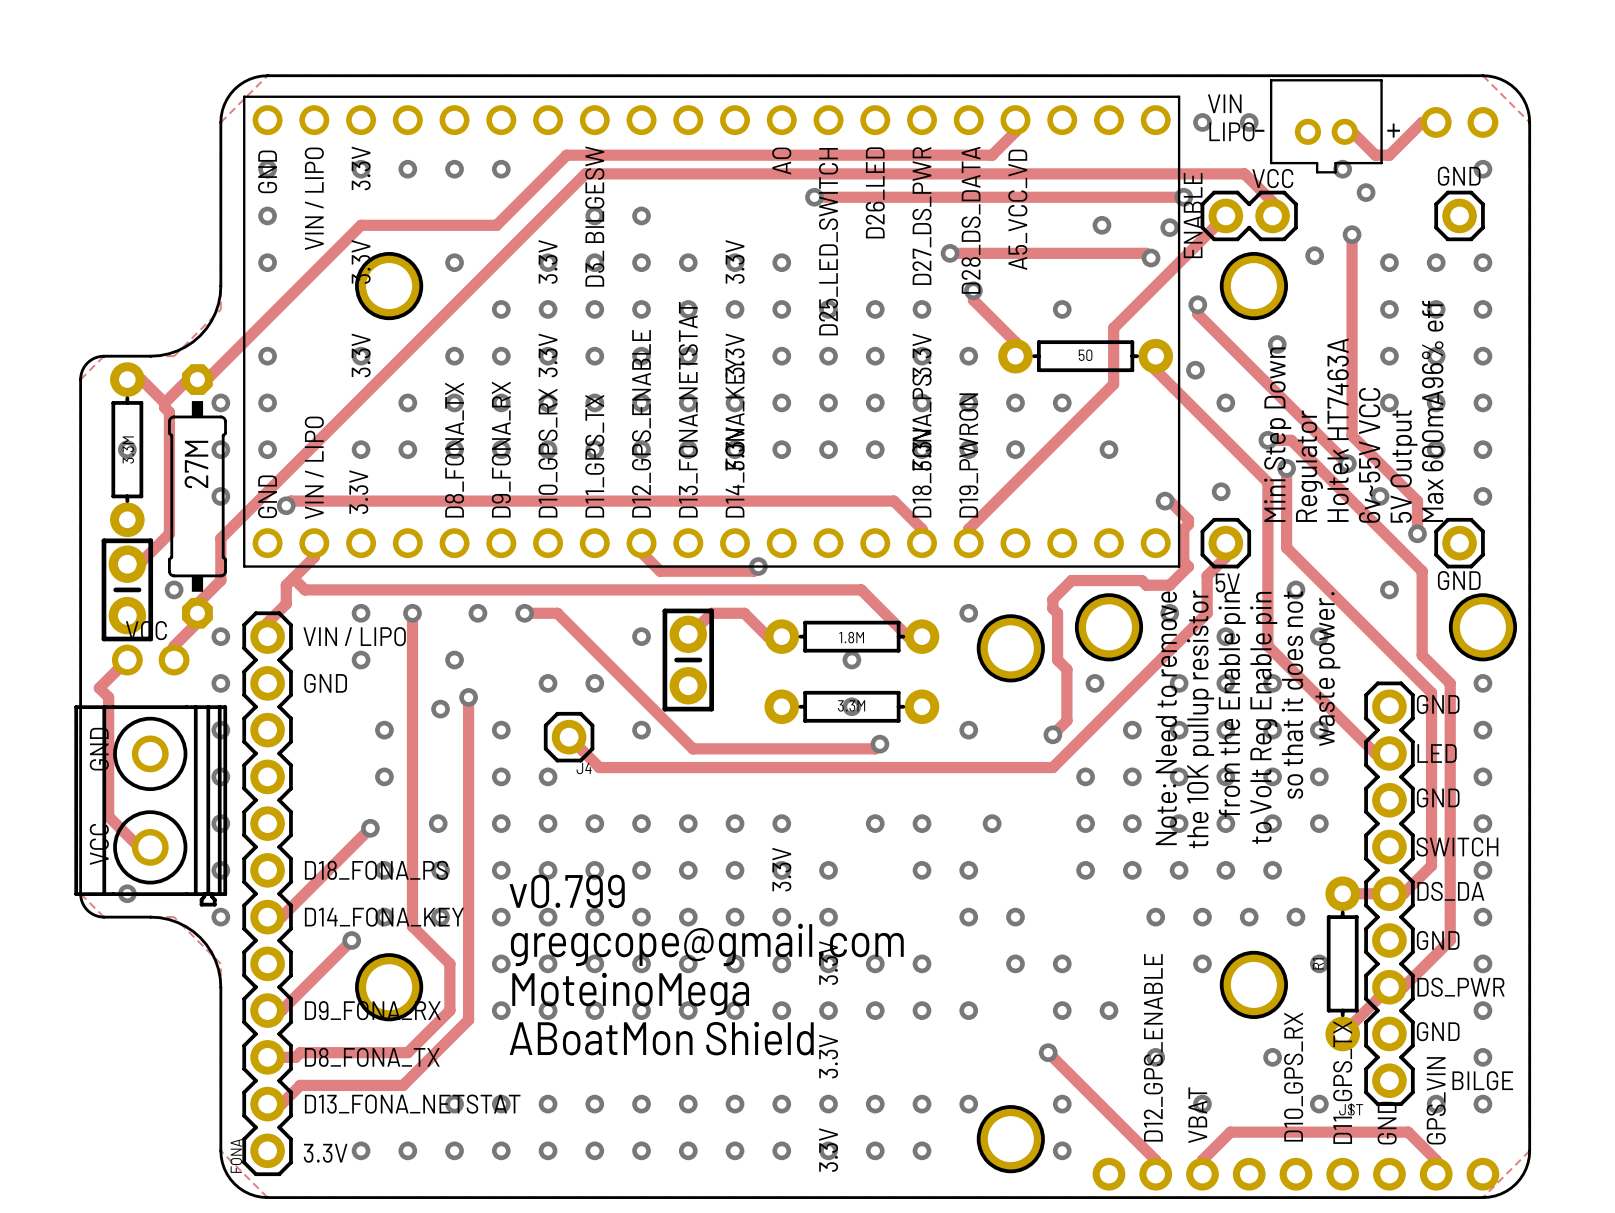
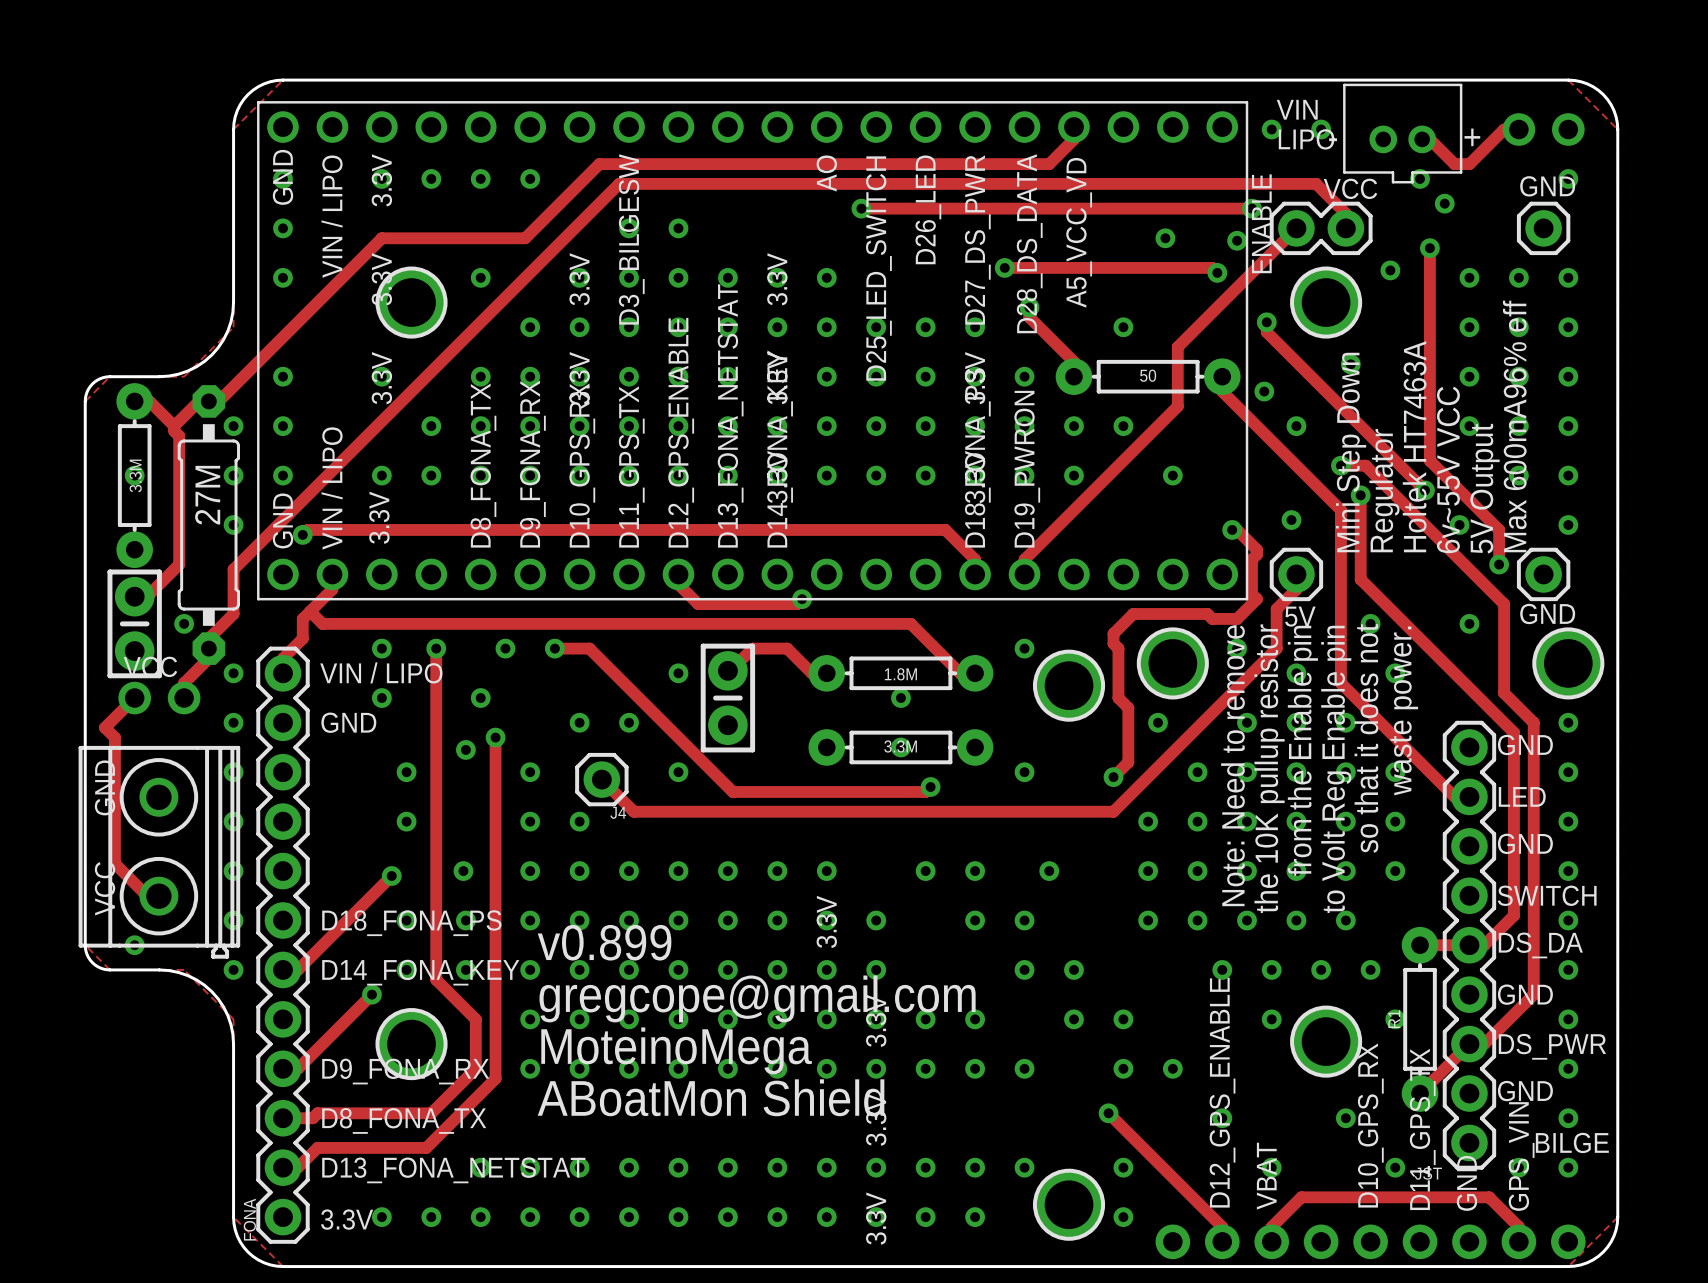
text: v0.799 (567, 891) -> v0.899 (604, 942)

